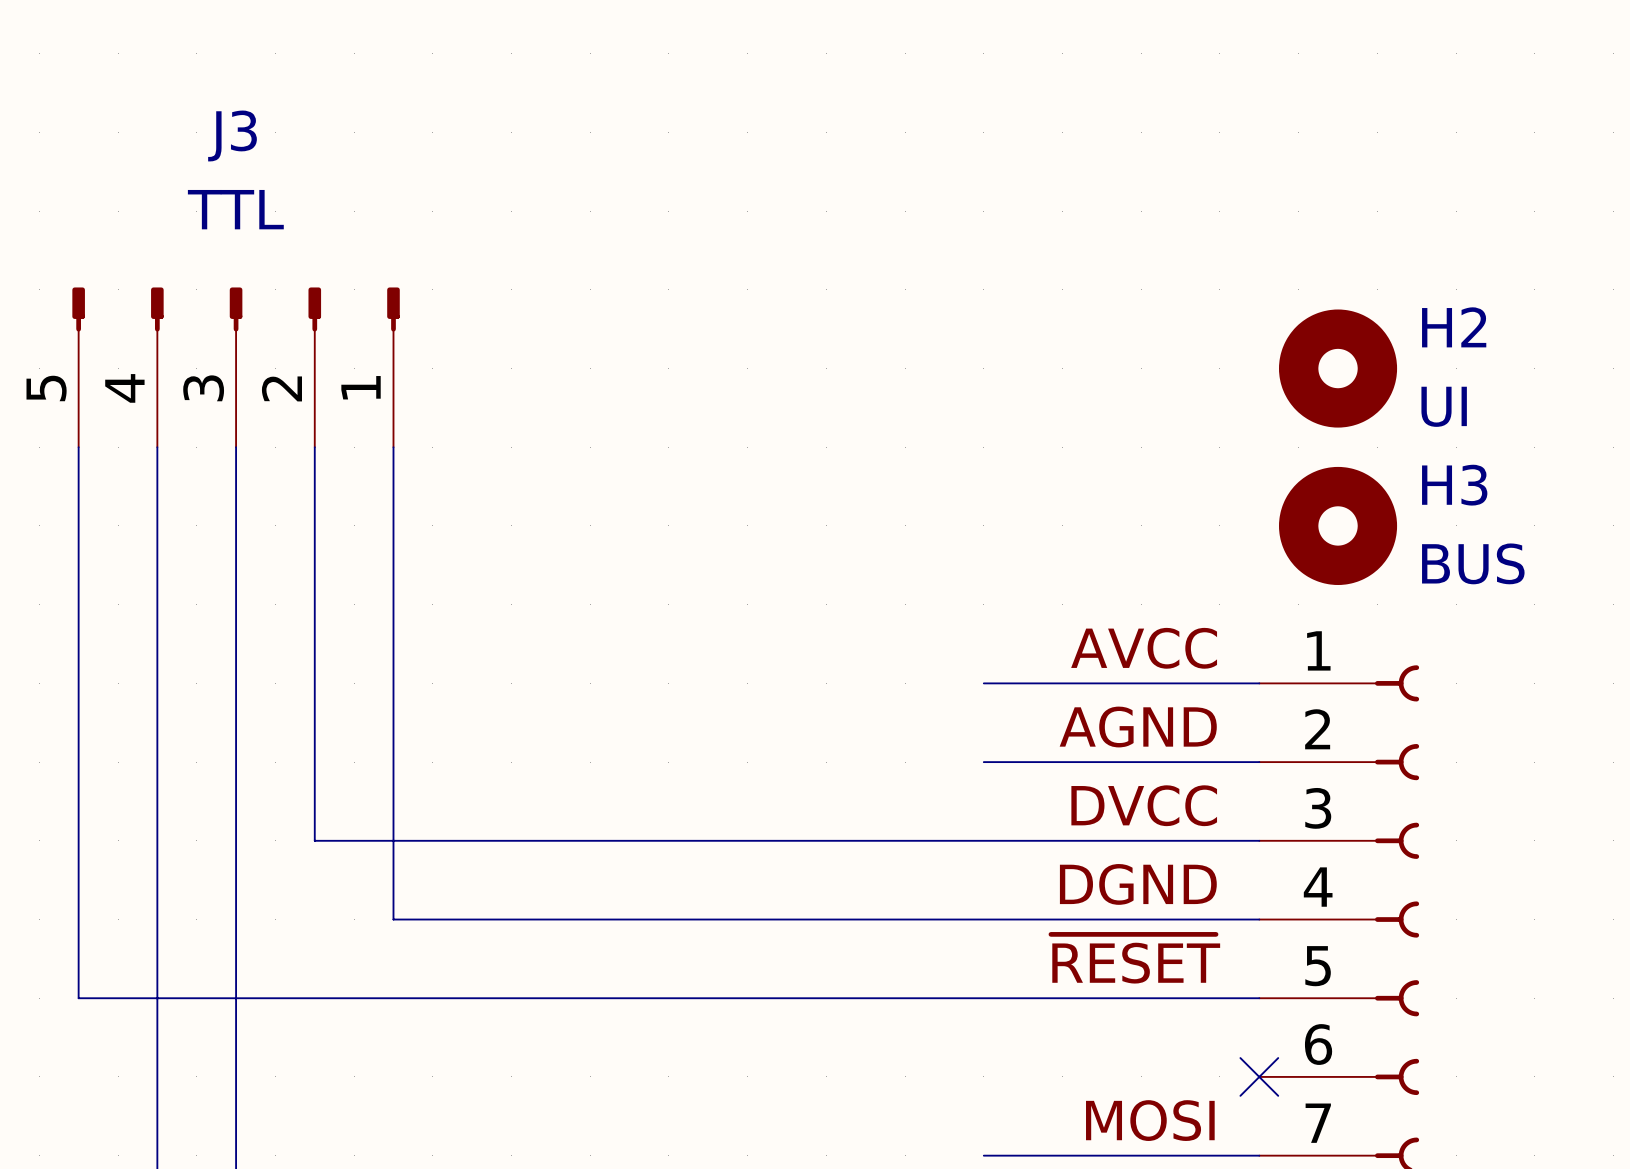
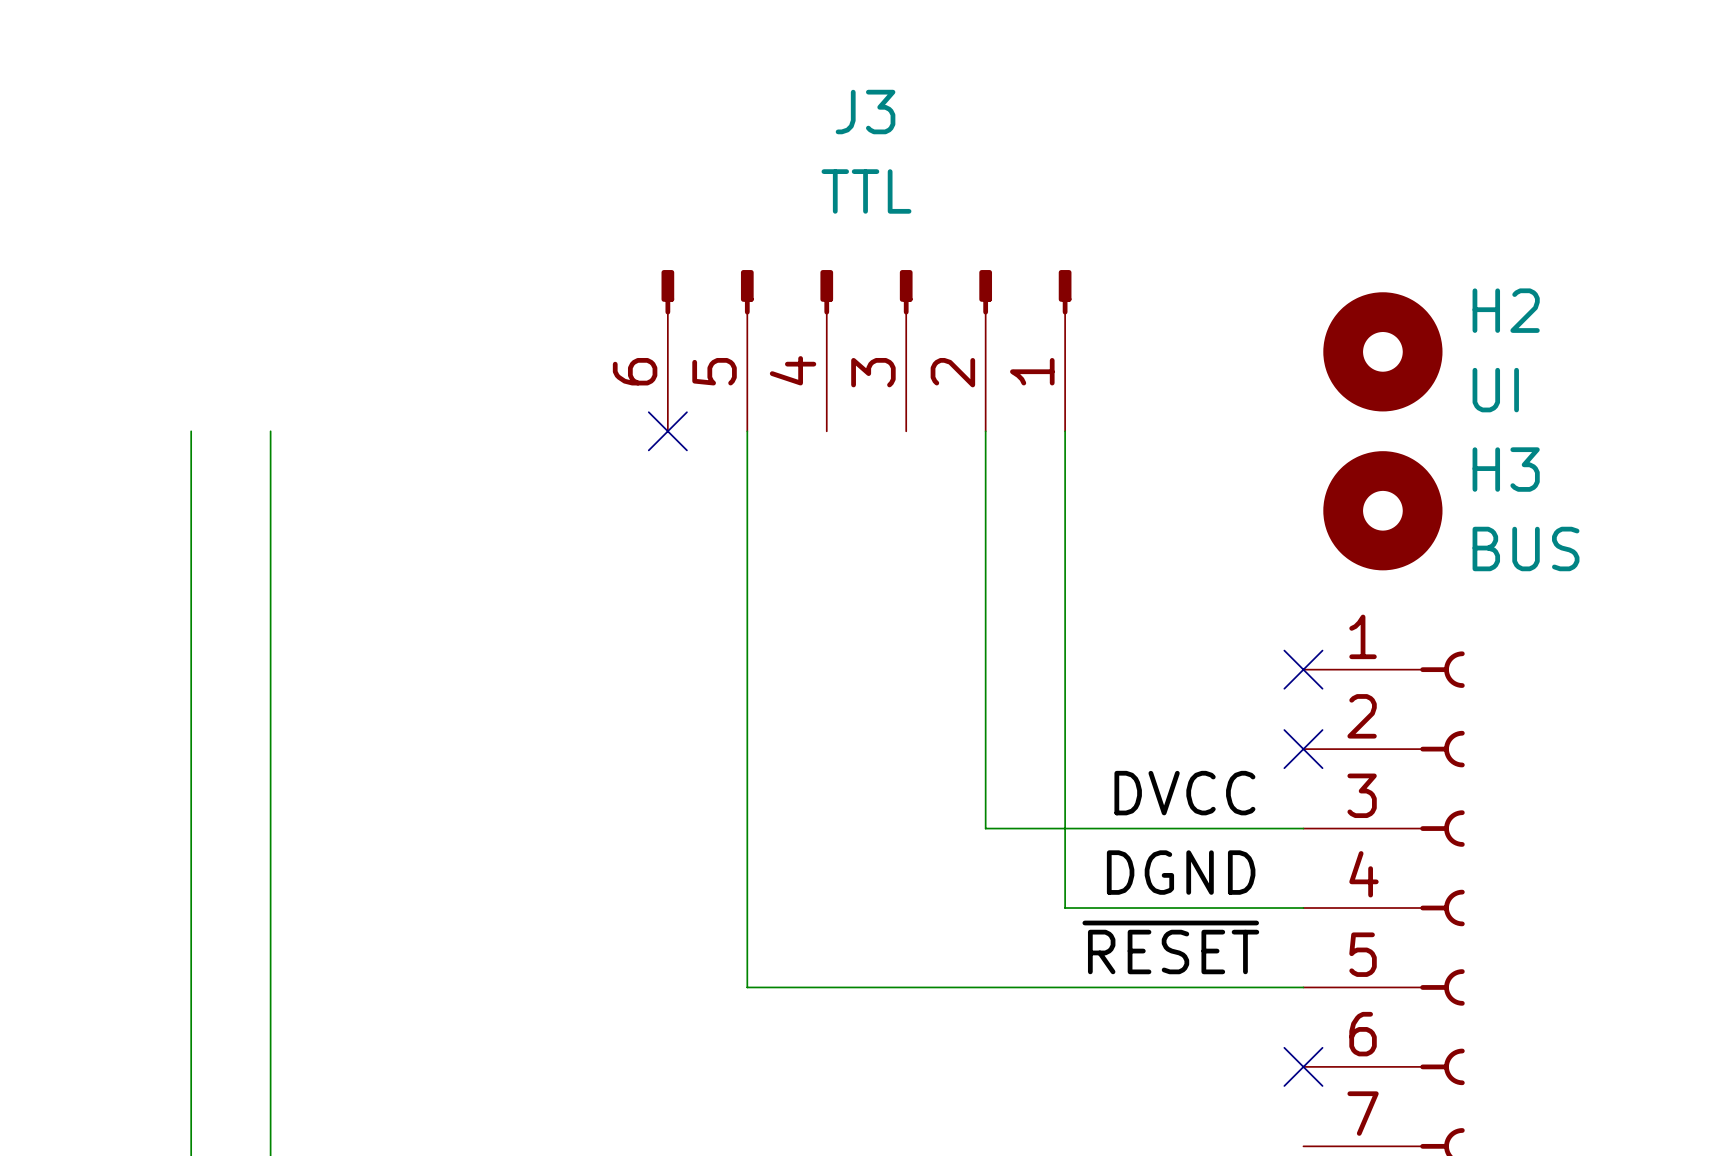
J3 symbol: [72, 287, 400, 448] -> [661, 270, 1072, 432]
wire: (78, 447) (78, 998) (708, 998) -> (747, 431) (747, 987)
wire: (314, 447) (314, 840) (944, 840) -> (985, 431) (985, 828)
wire: (393, 447) (393, 919) (1023, 919) -> (1065, 431) (1065, 908)
no-connect mark: none -> (667, 431)
label: AVCC (1144, 648) -> none
wire: (983, 683) (1259, 683) -> none
no-connect mark: none -> (1303, 669)
label: AGND (1138, 727) -> none
wire: (983, 762) (1259, 762) -> none
no-connect mark: none -> (1303, 749)
label: MOSI (1150, 1120) -> none
wire: (983, 1155) (1259, 1155) -> none

